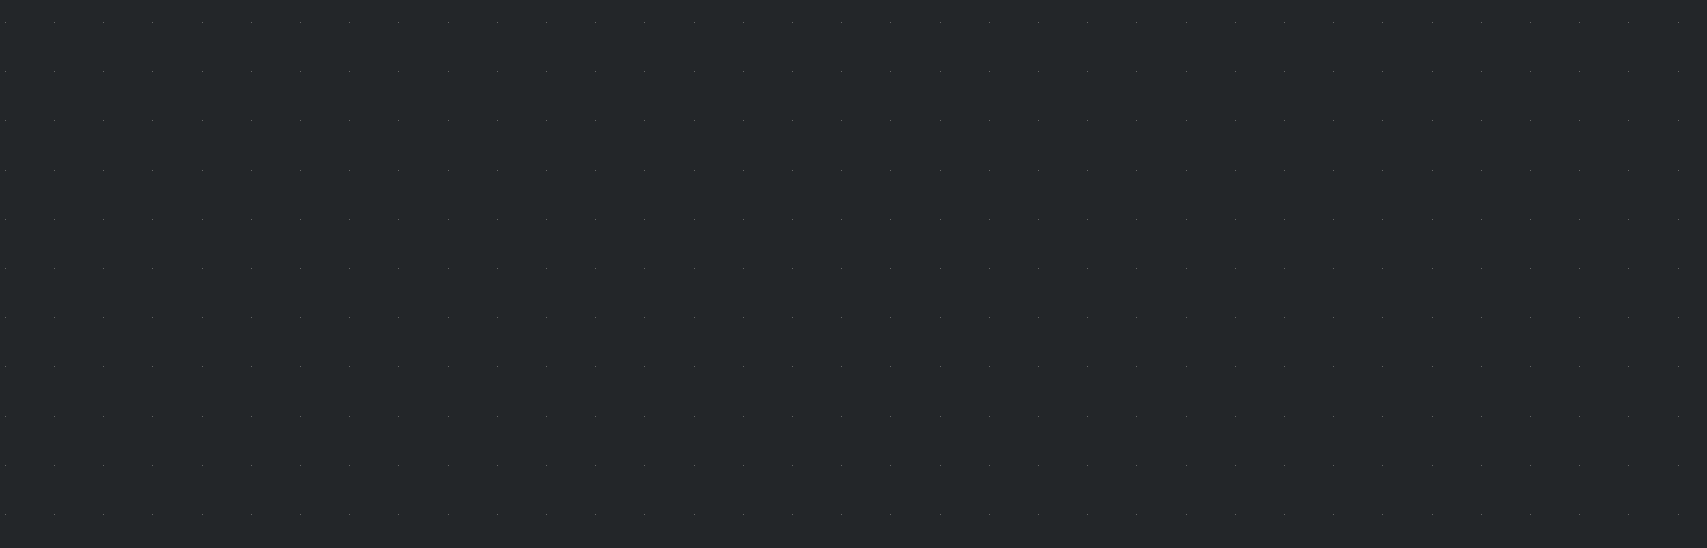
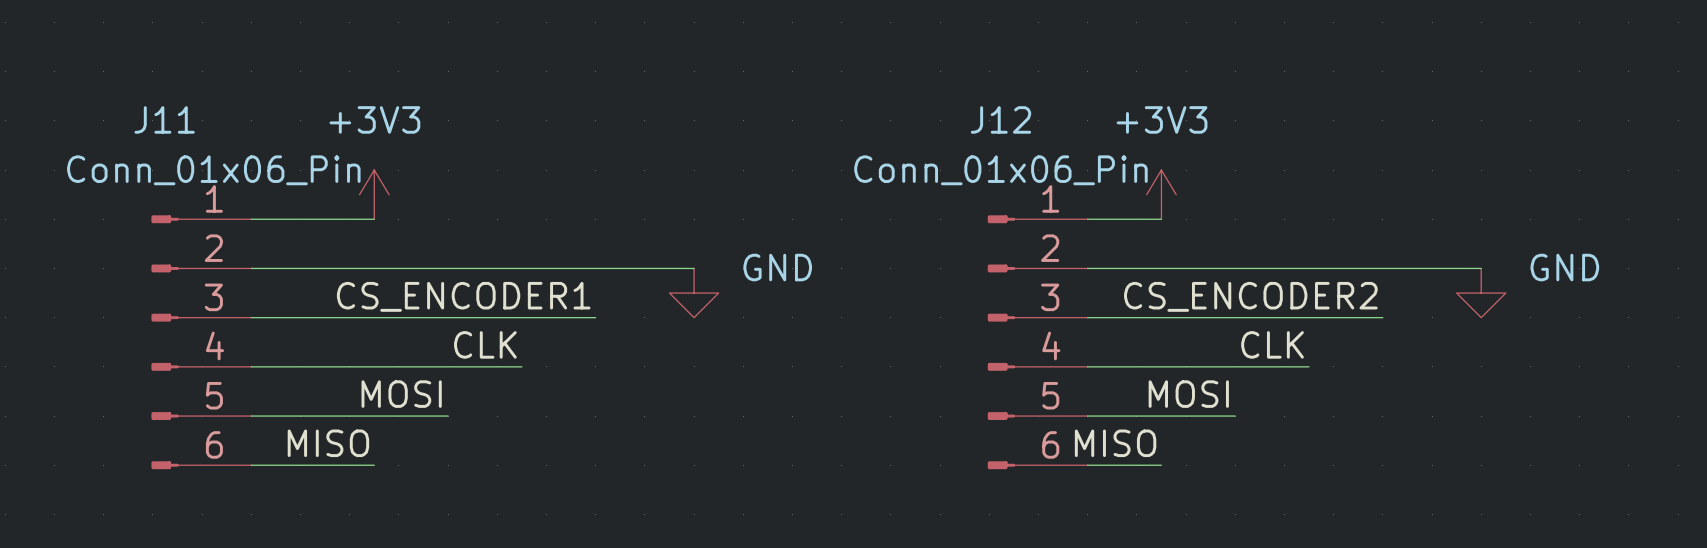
power symbol: none -> +3V3 (374, 194)
power symbol: none -> +3V3 (1161, 194)
wire: none -> (251, 219) (374, 219)
wire: none -> (1087, 219) (1161, 219)
wire: none -> (251, 268) (694, 268)
wire: none -> (1087, 268) (1481, 268)
power symbol: none -> GND (694, 293)
power symbol: none -> GND (1481, 293)
label: none -> CS_ENCODER1 (463, 296)
label: none -> CS_ENCODER2 (1250, 296)
wire: none -> (251, 317) (595, 317)
wire: none -> (1087, 317) (1382, 317)
J11: none -> Conn_01x06_Pin (201, 342)
J12: none -> Conn_01x06_Pin (1037, 342)
label: none -> CLK (485, 344)
label: none -> CLK (1272, 344)
wire: none -> (251, 366) (521, 366)
wire: none -> (1087, 366) (1309, 366)
label: none -> MOSI (401, 394)
label: none -> MOSI (1188, 394)
wire: none -> (251, 416) (448, 416)
wire: none -> (1087, 416) (1235, 416)
label: none -> MISO (328, 443)
label: none -> MISO (1115, 443)
wire: none -> (251, 465) (374, 465)
wire: none -> (1087, 465) (1161, 465)

